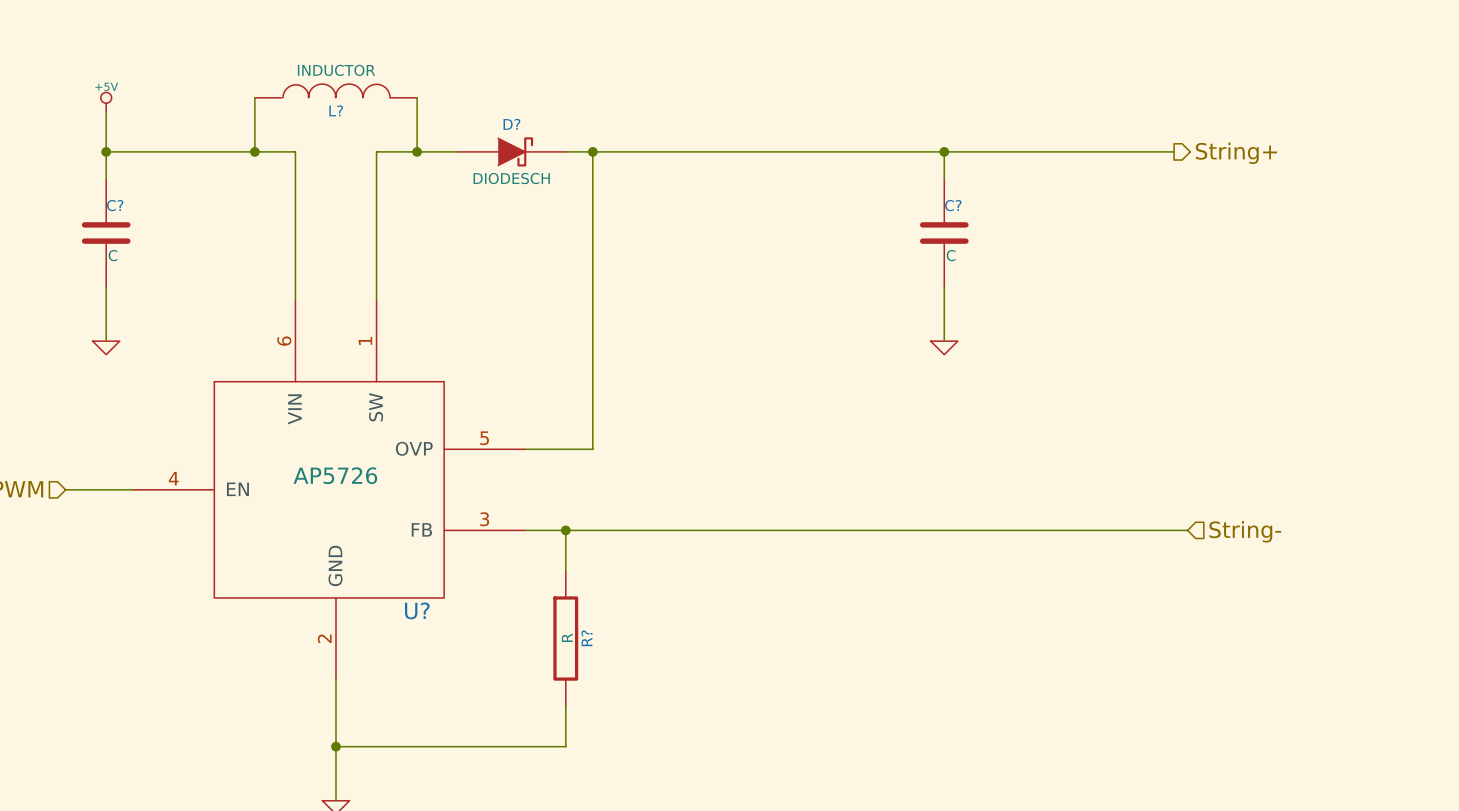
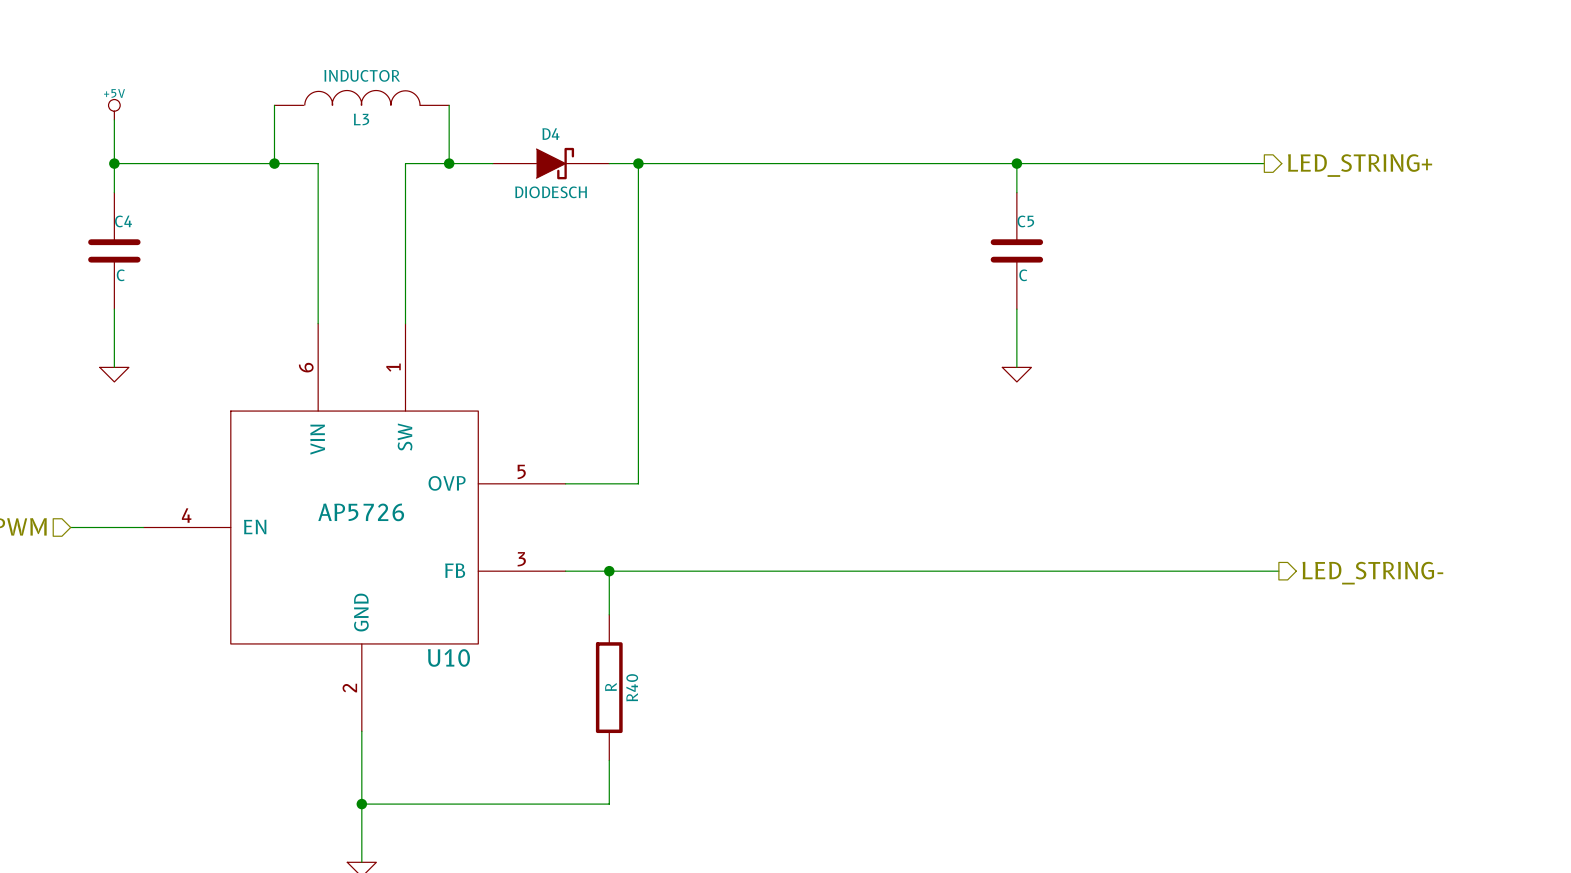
L? name: L? (336, 110) -> L3 (361, 119)
D? name: D? (511, 124) -> D4 (550, 134)
hierarchical label: String+ (1236, 153) -> LED_STRING+ (1360, 165)
C? name: C? (115, 205) -> C4 (123, 221)
C? name: C? (953, 205) -> C5 (1025, 221)
hierarchical label shape: input (1245, 531) -> output (1372, 573)
hierarchical label: String- (1245, 531) -> LED_STRING- (1372, 573)
U? name: U? (417, 610) -> U10 (448, 657)
R? name: R? (586, 638) -> R40 (632, 687)

